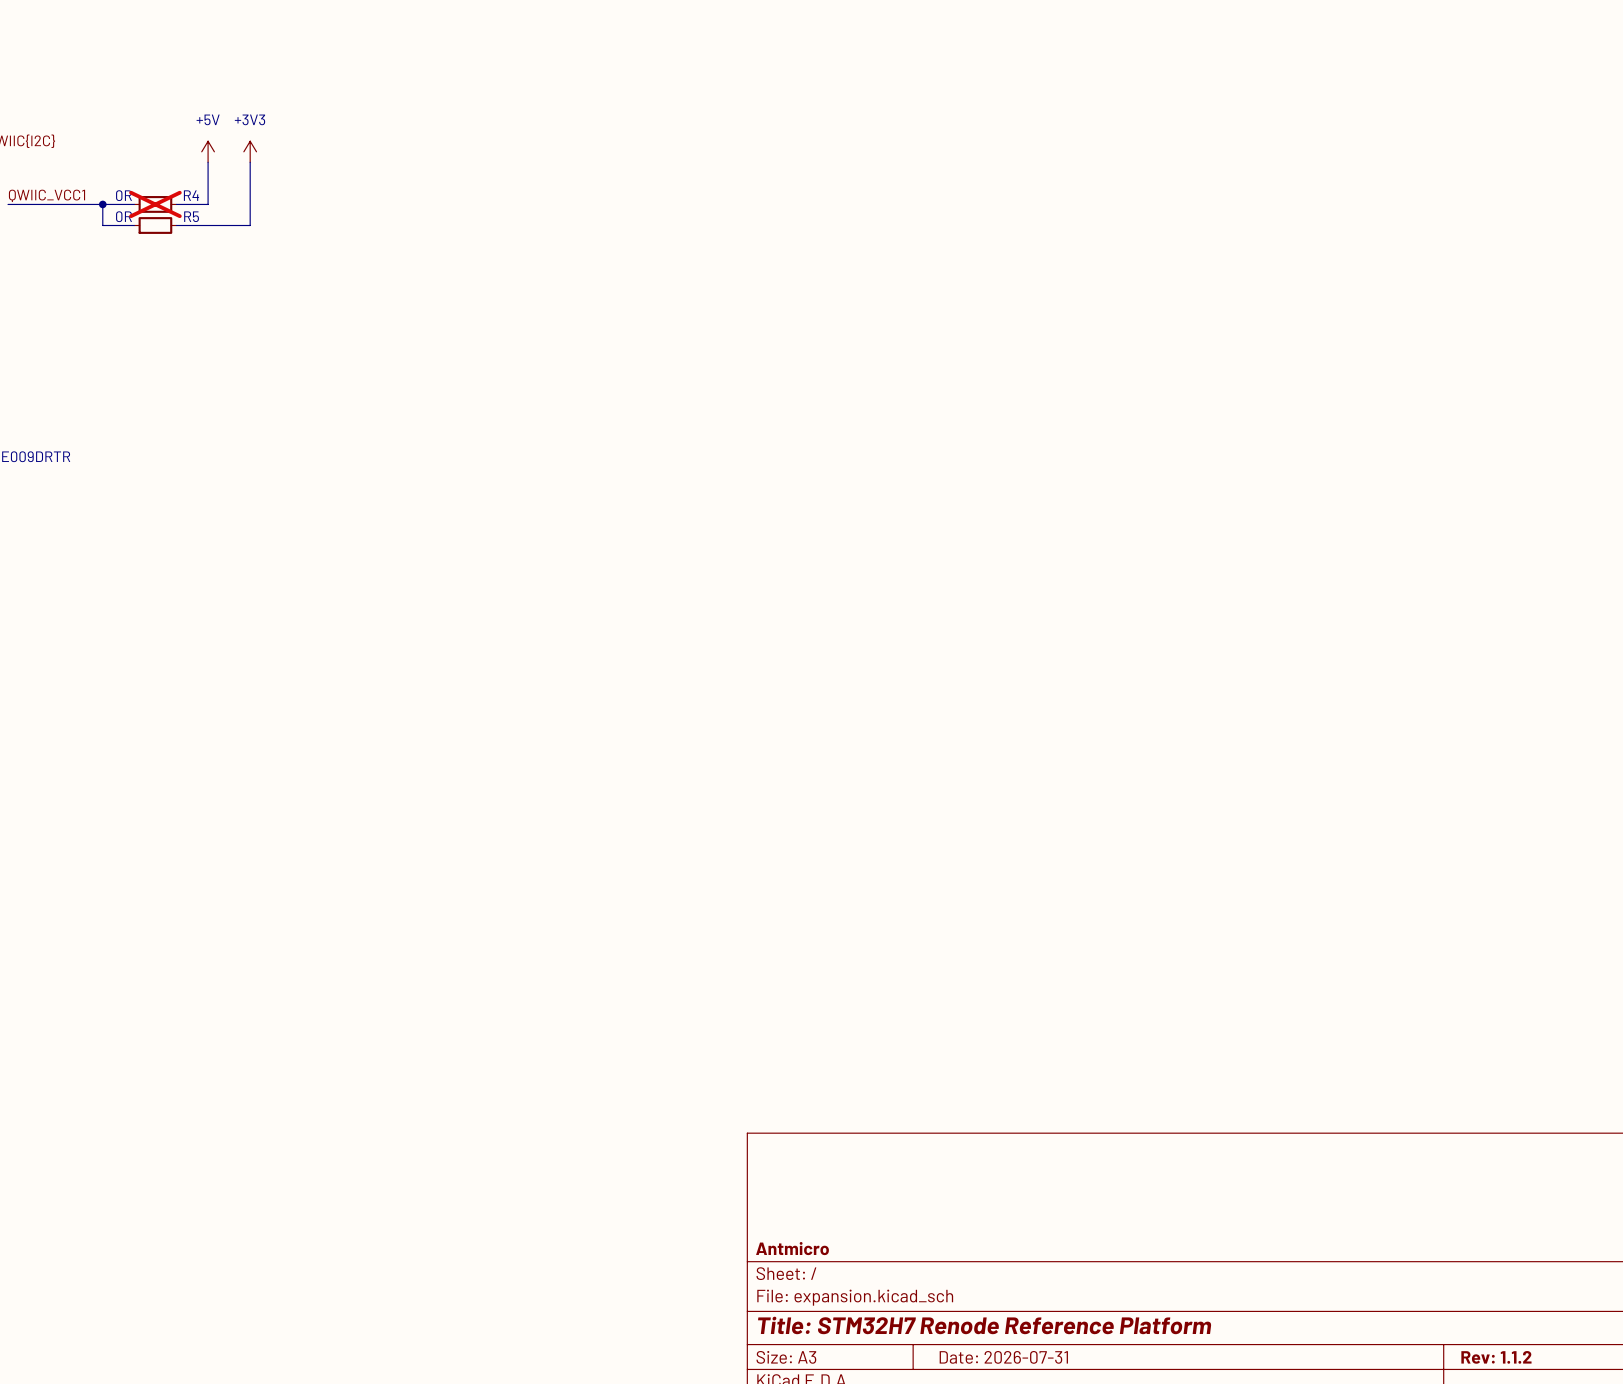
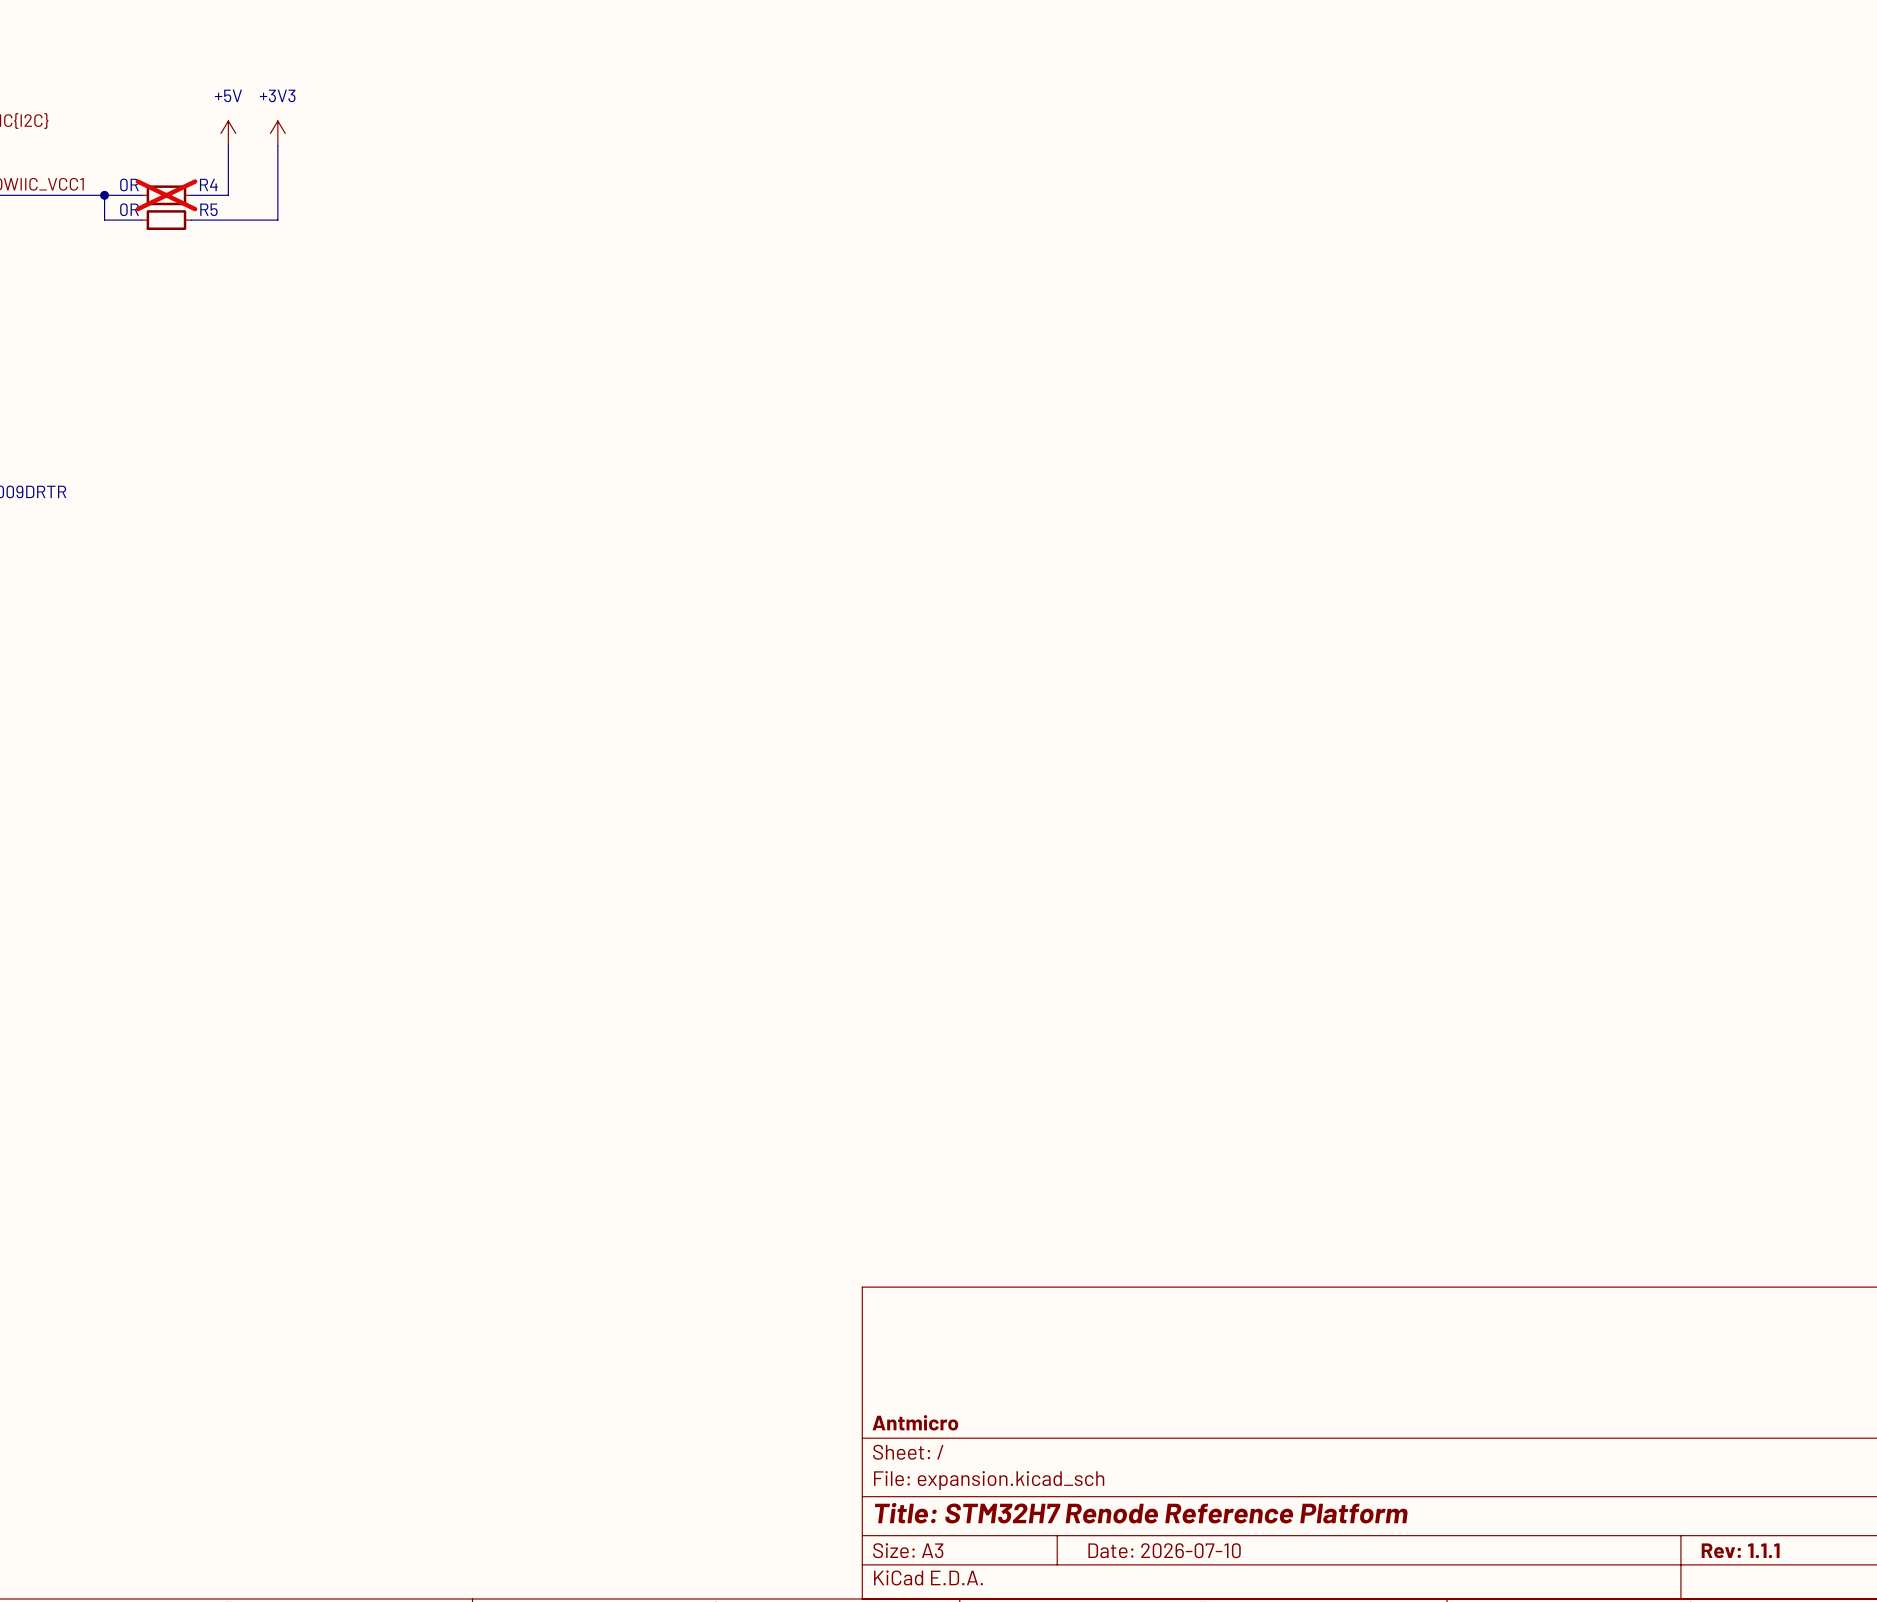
title block: Date: 2026-07-31 (1003, 1357) -> Date: 2026-07-10 (1164, 1550)
title block: Rev: 1.1.2 (1496, 1357) -> Rev: 1.1.1 (1740, 1550)

